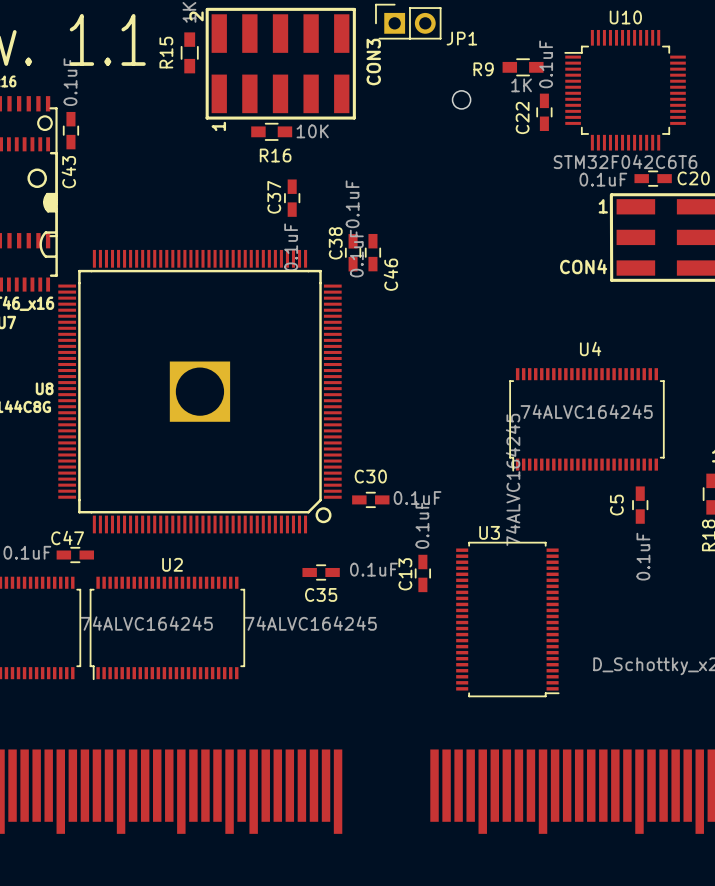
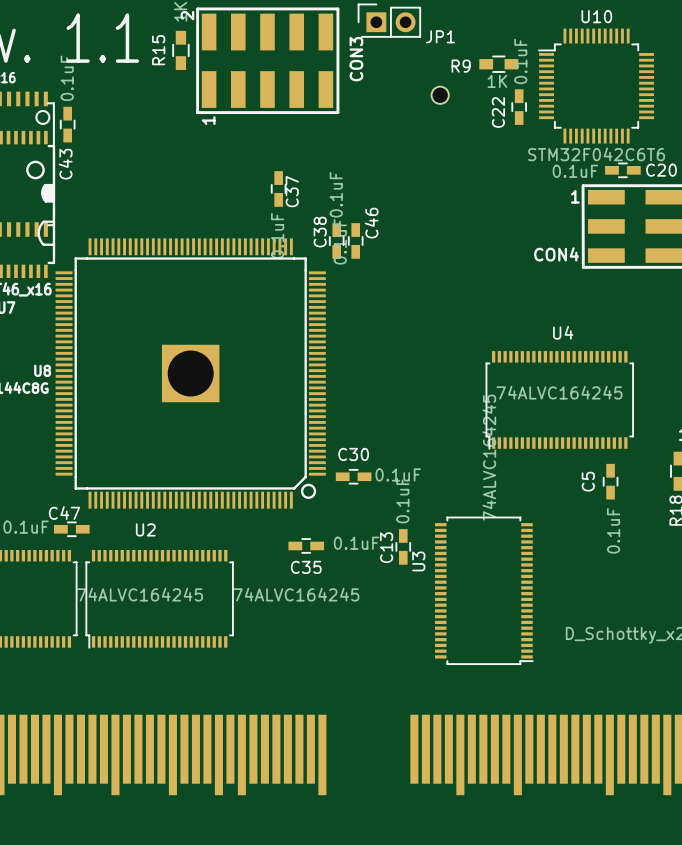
R16: 10K (271, 131) -> none
C37 name position: C37 (274, 197) -> C37 (292, 191)
C46 name position: C46 (390, 274) -> C46 (371, 223)
U3 name rotation: 0° (489, 532) -> 90° counterclockwise (418, 561)
U3 name position: U3 (489, 532) -> U3 (418, 561)
U2 name position: U2 (172, 564) -> U2 (145, 529)

